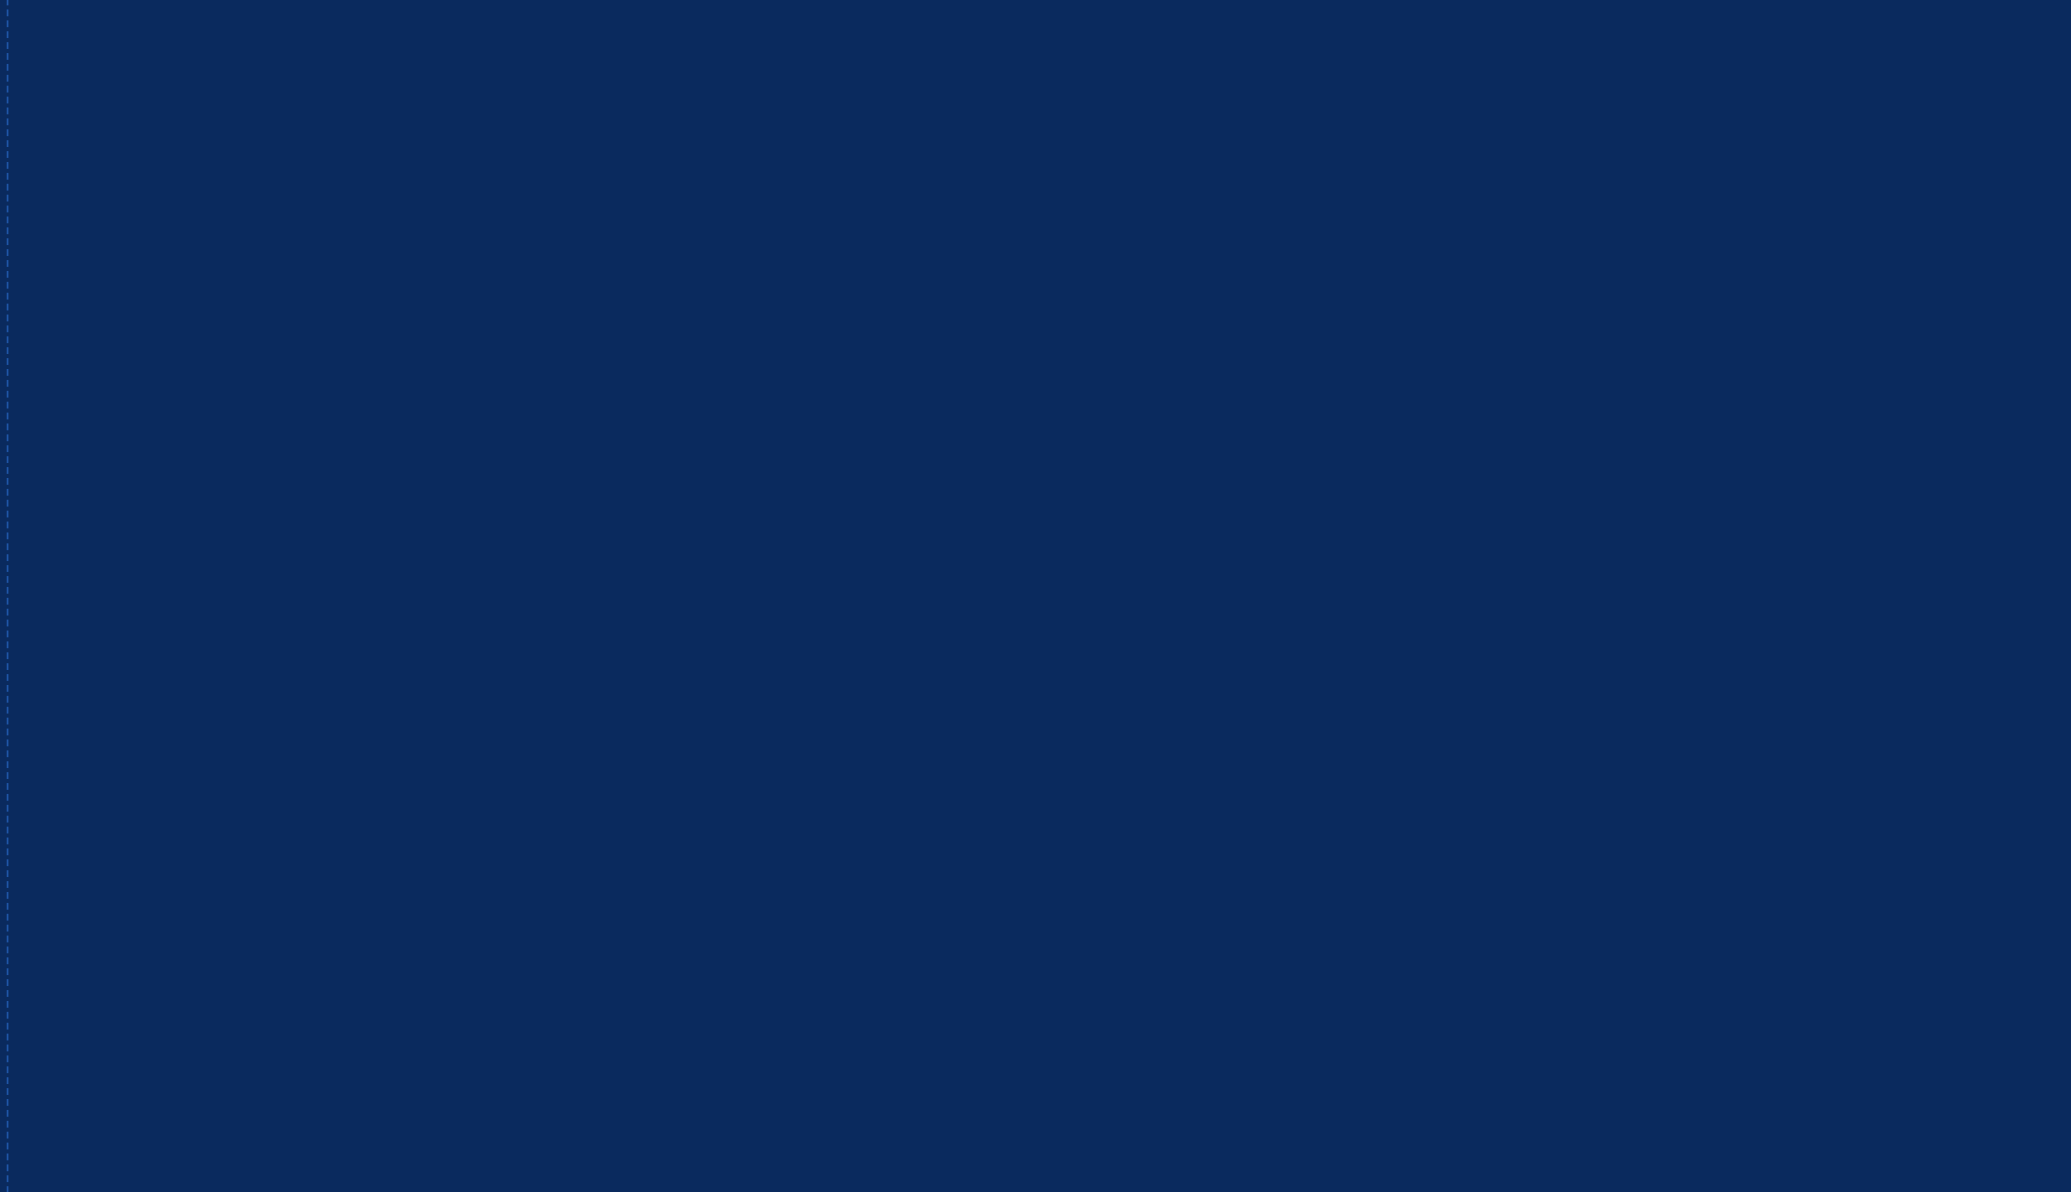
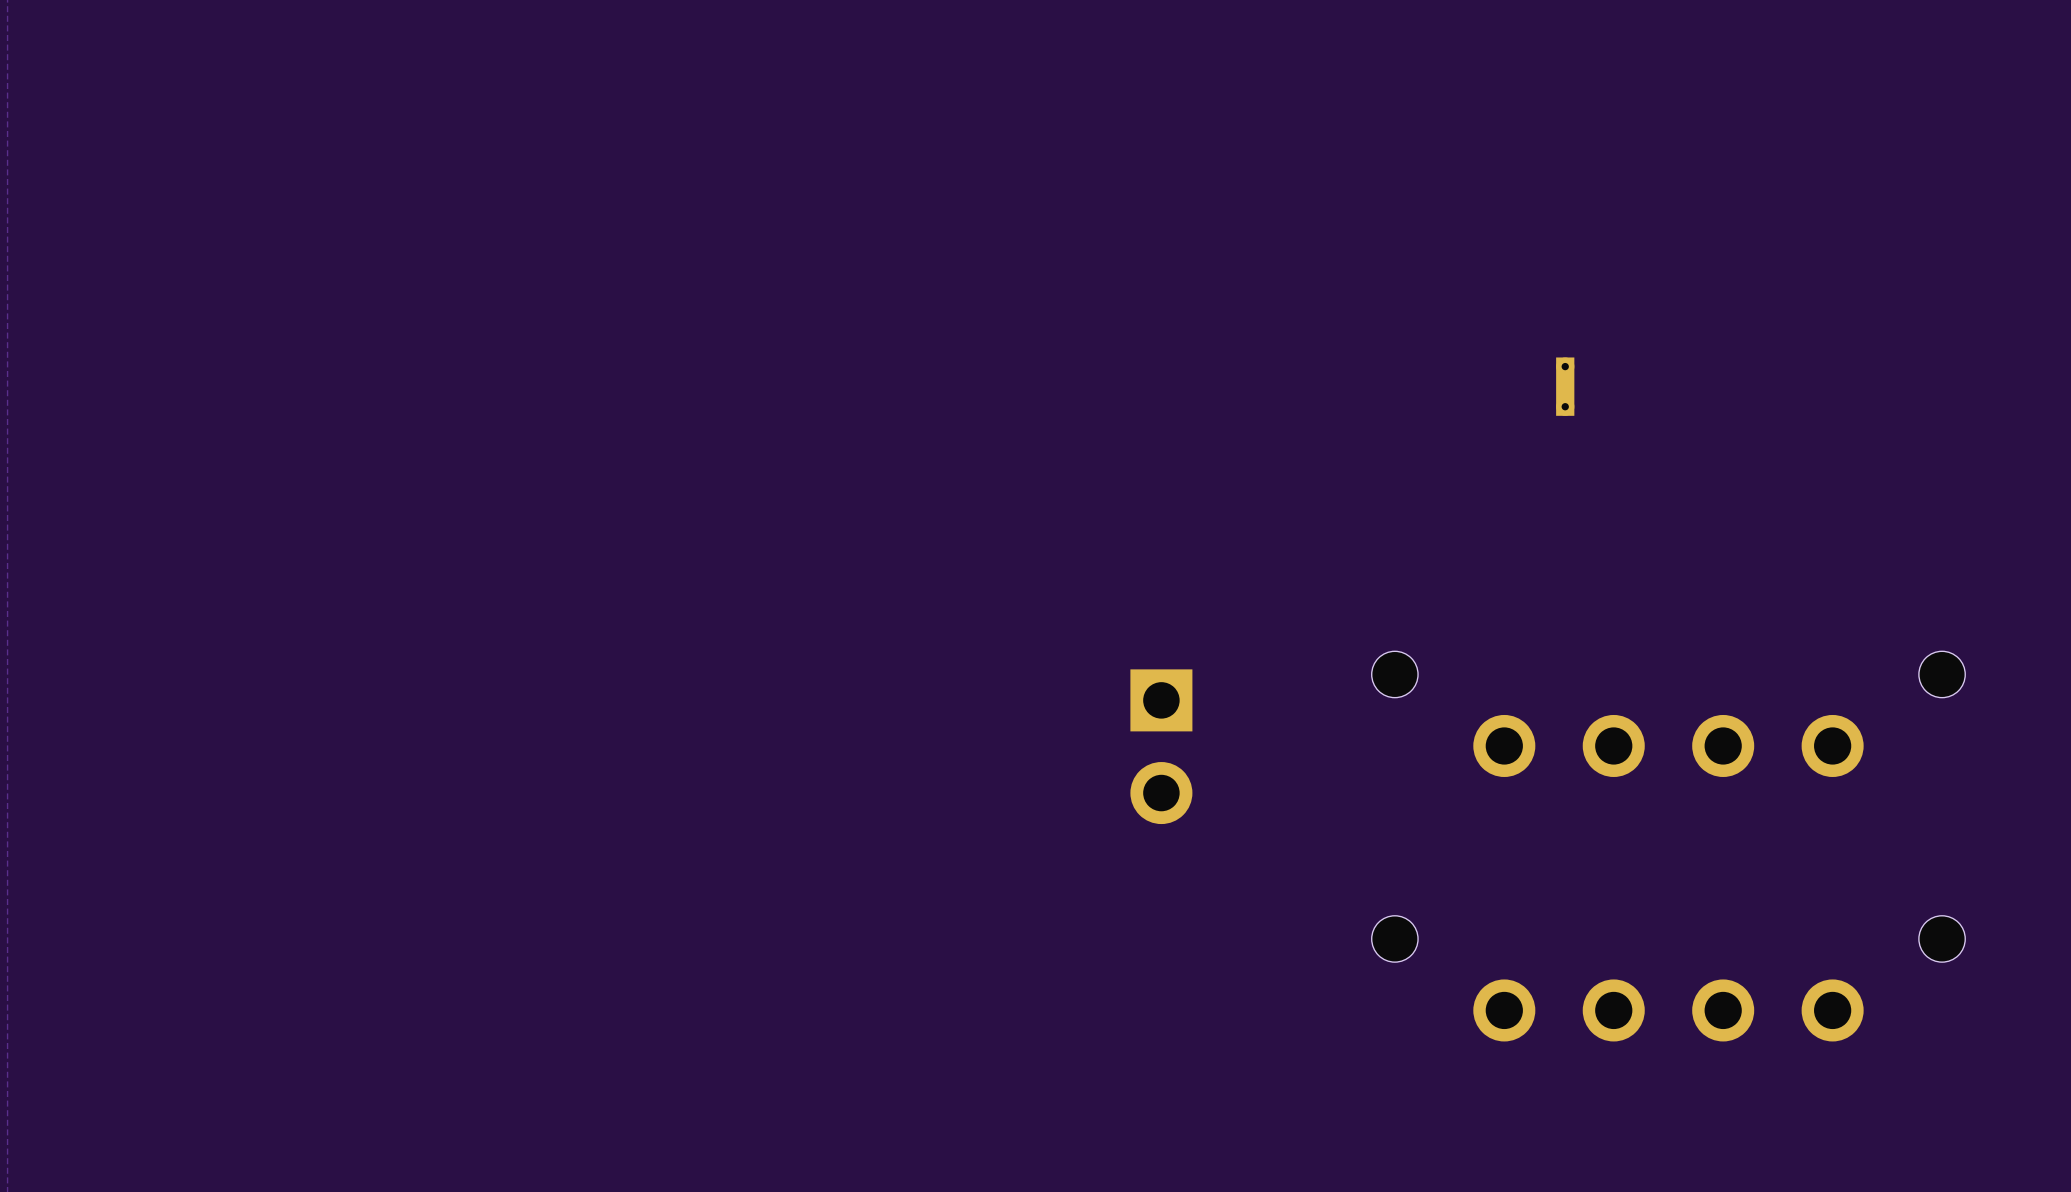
part: none -> (1565, 386)
part: none -> (1668, 714)
part: none -> (1161, 746)
part: none -> (1668, 978)

